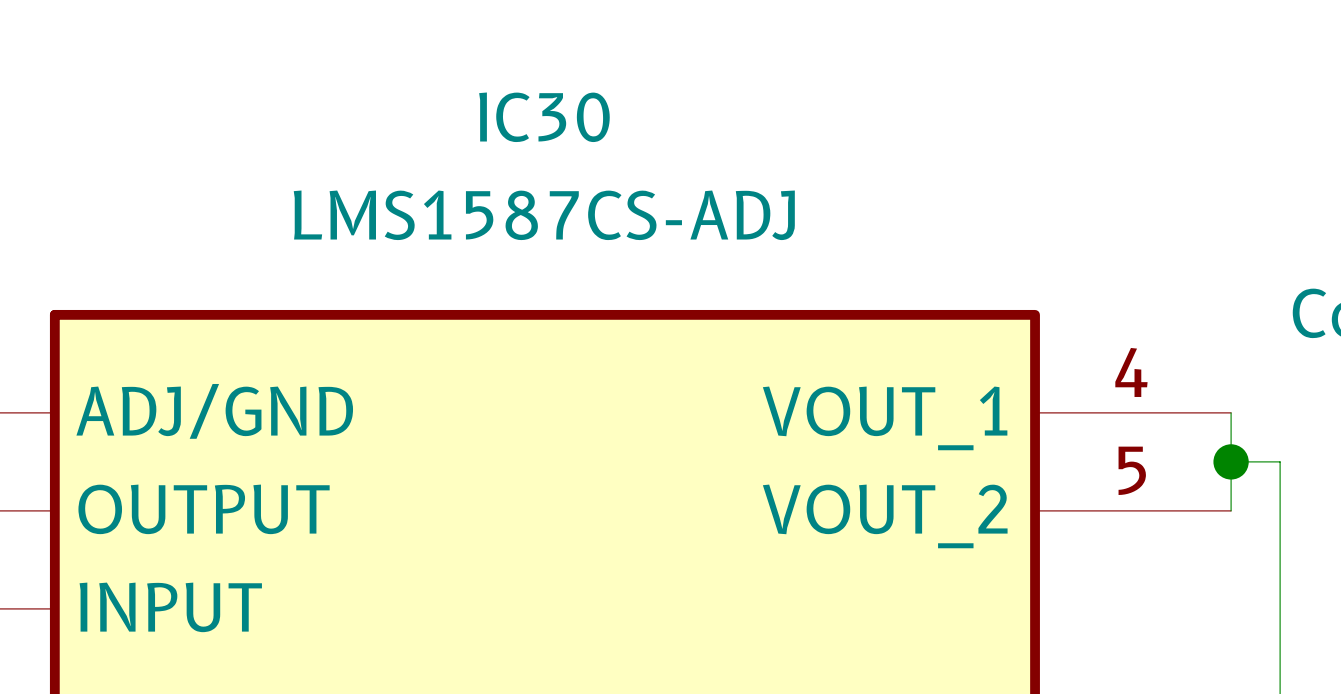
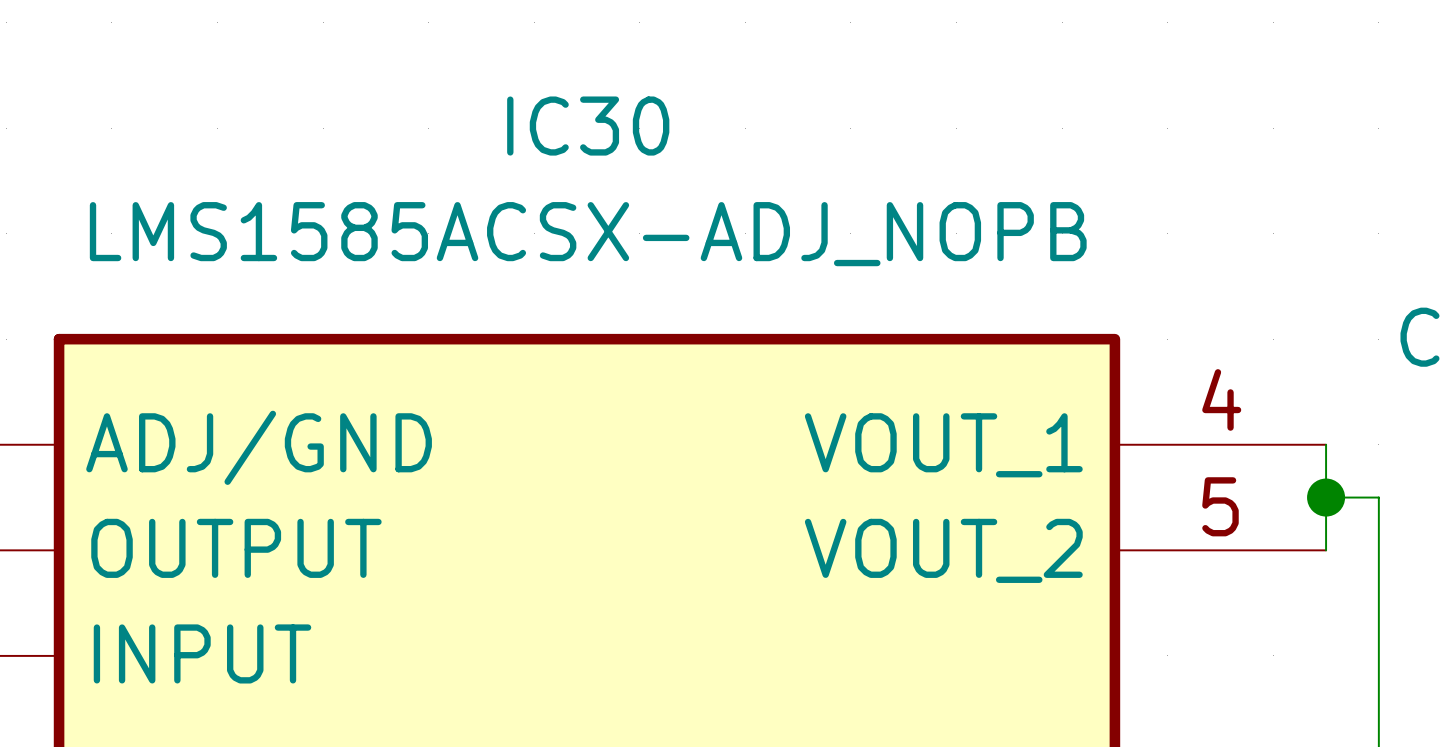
IC30 value: LMS1587CS-ADJ (544, 215) -> LMS1585ACSX-ADJ_NOPB (588, 234)

